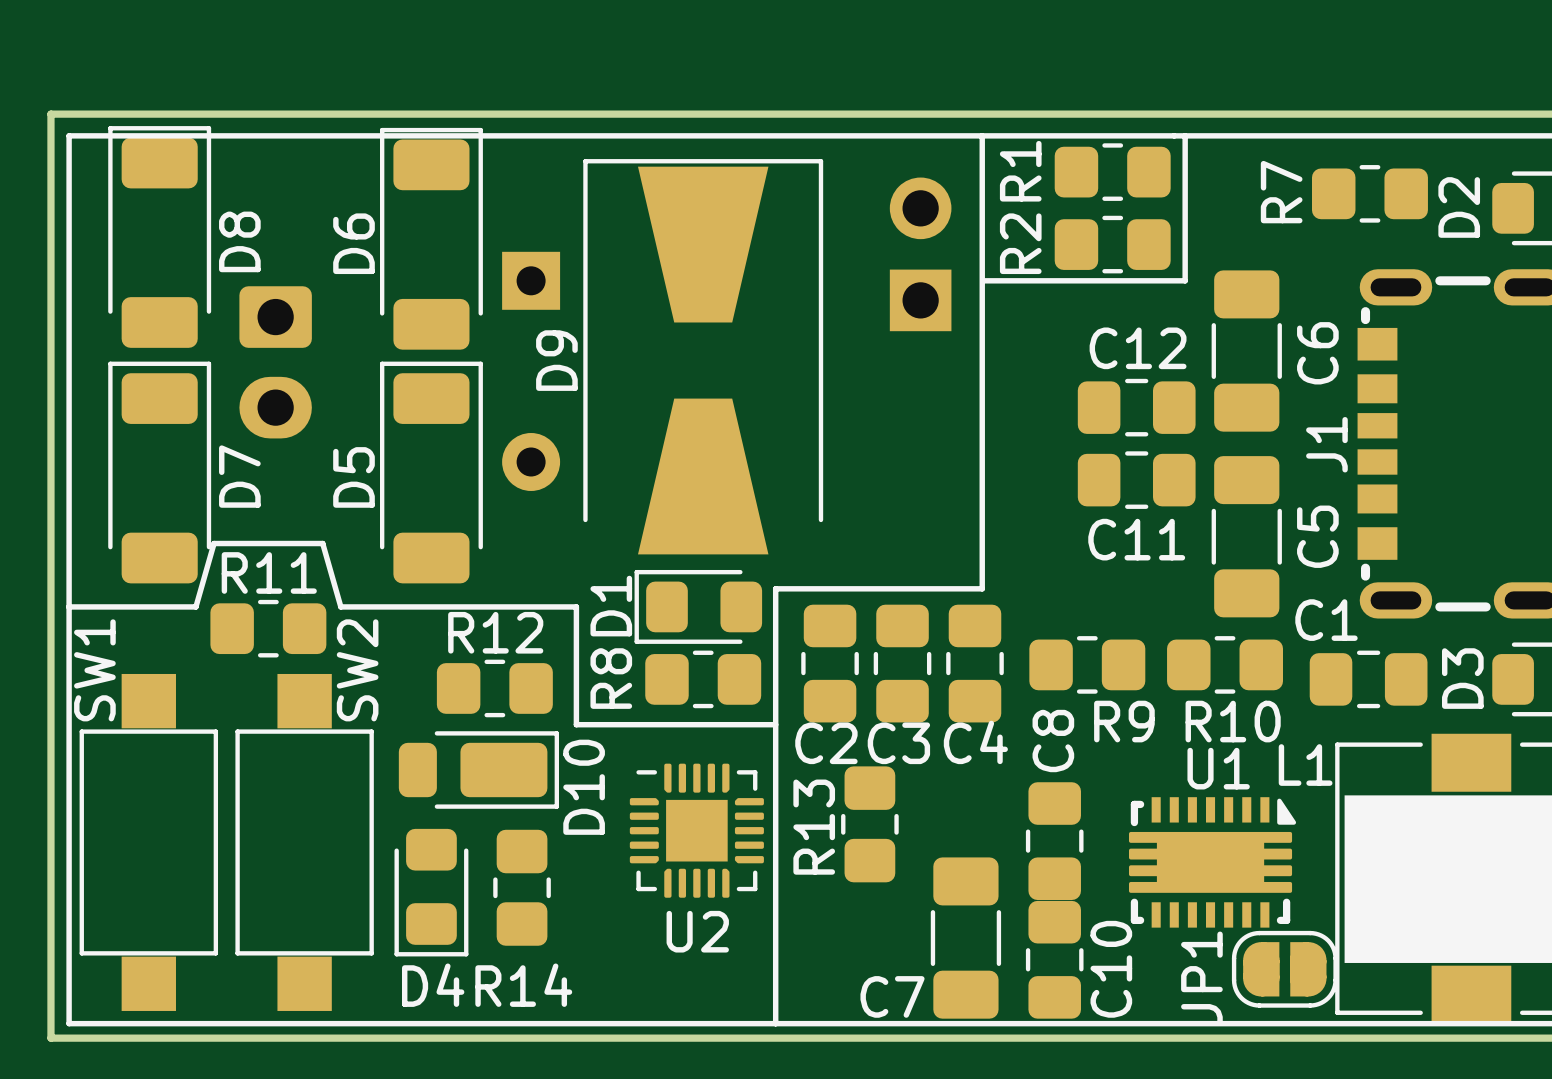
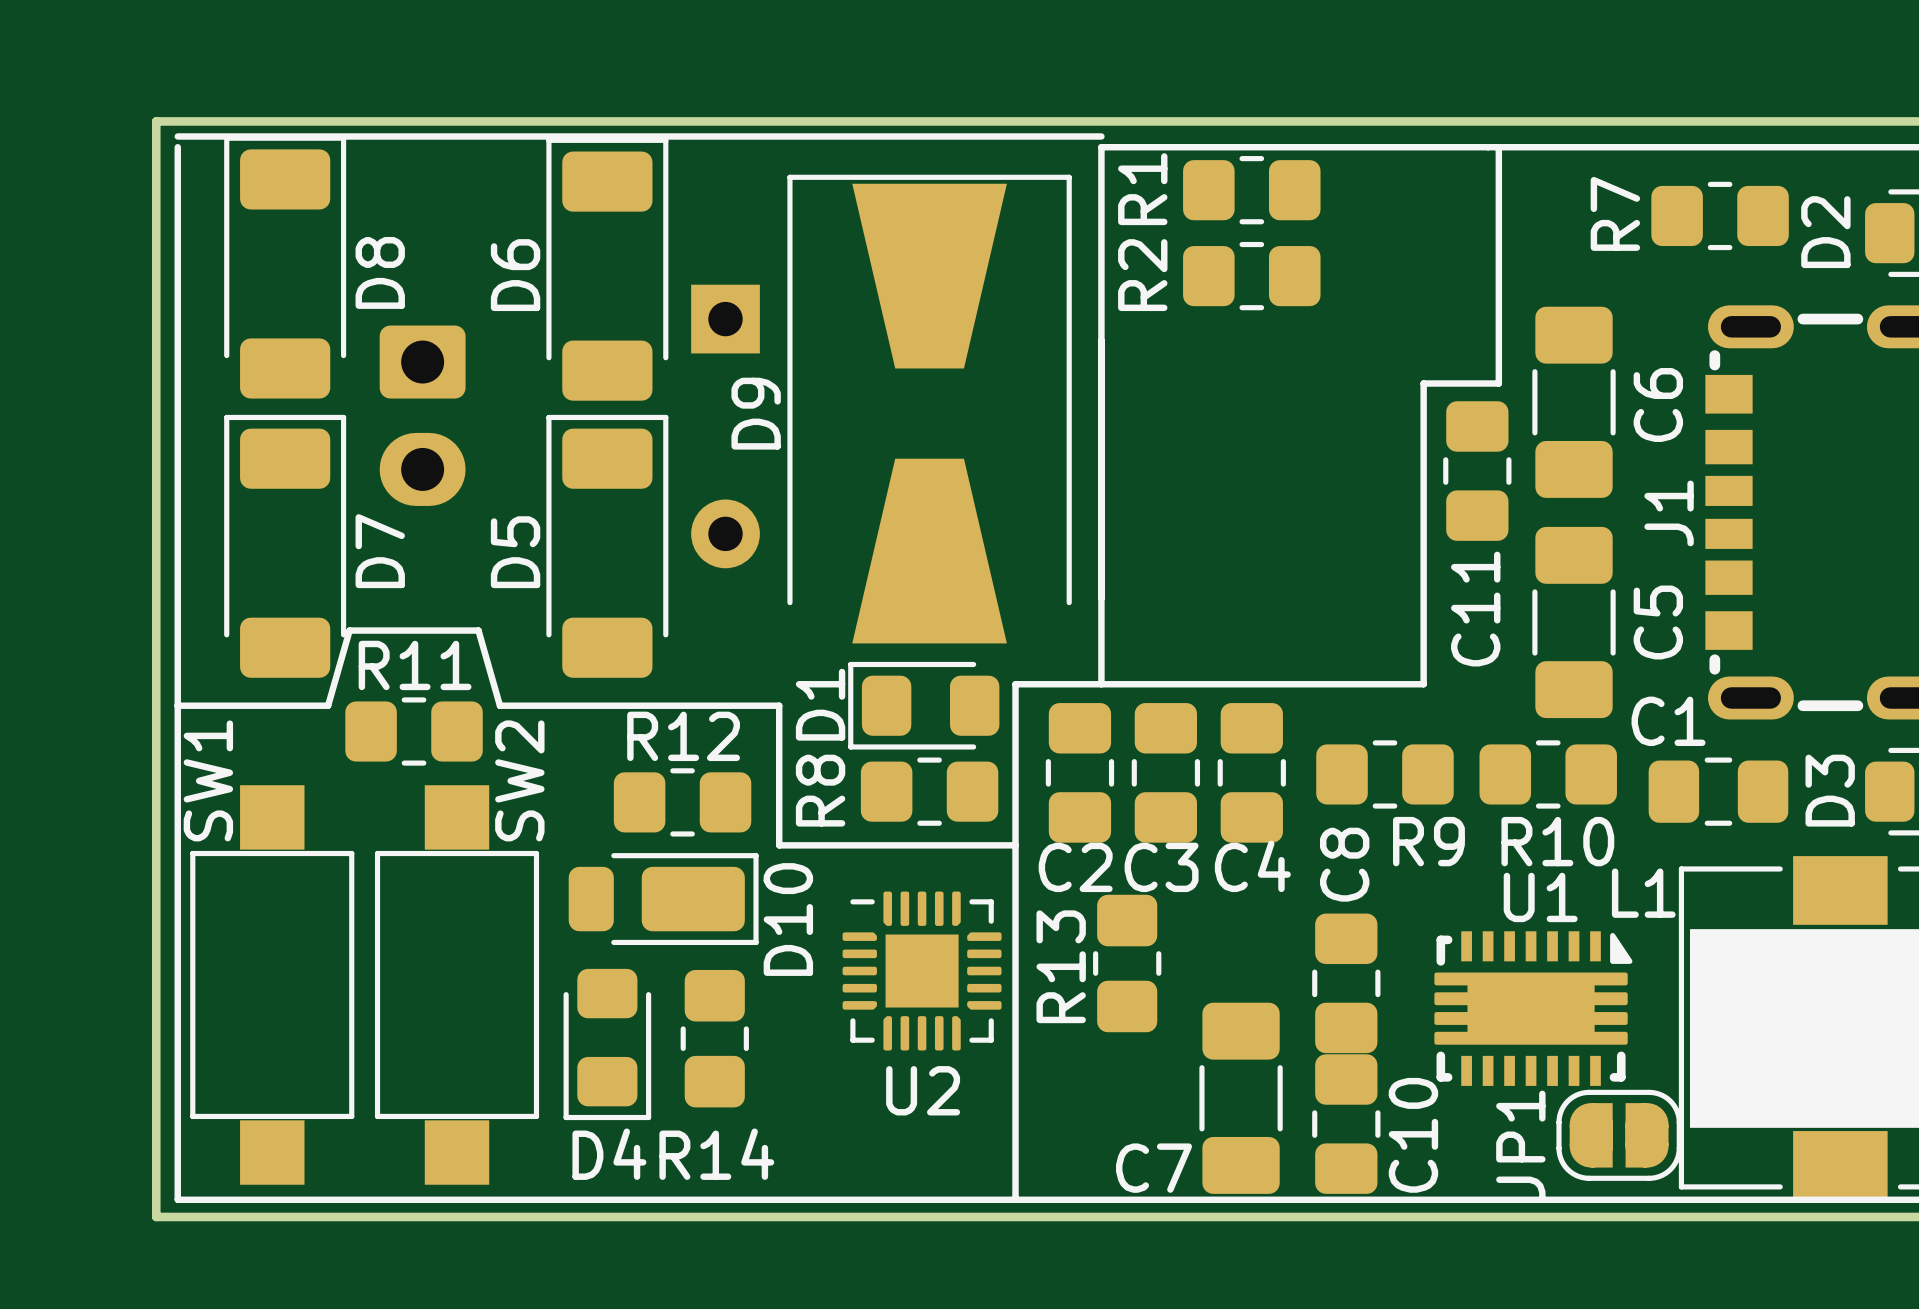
line: none -> (177, 136) (1101, 136)
line: (69, 135) (848, 135) -> (1101, 684) (1101, 147)
line: (982, 135) (982, 588) -> (1498, 147) (1498, 383) (1423, 383) (1423, 684) (1260, 684)
line: (1185, 135) (1185, 280) (983, 280) -> none
R1 position: (1112, 172) -> (1251, 190)
R2 position: (1112, 244) -> (1251, 276)
part: (920, 254) -> none
C12: (1136, 407) -> none
C11 rotation: 0° (1136, 480) -> 90° clockwise (1477, 471)
C11 position: (1136, 480) -> (1477, 471)

